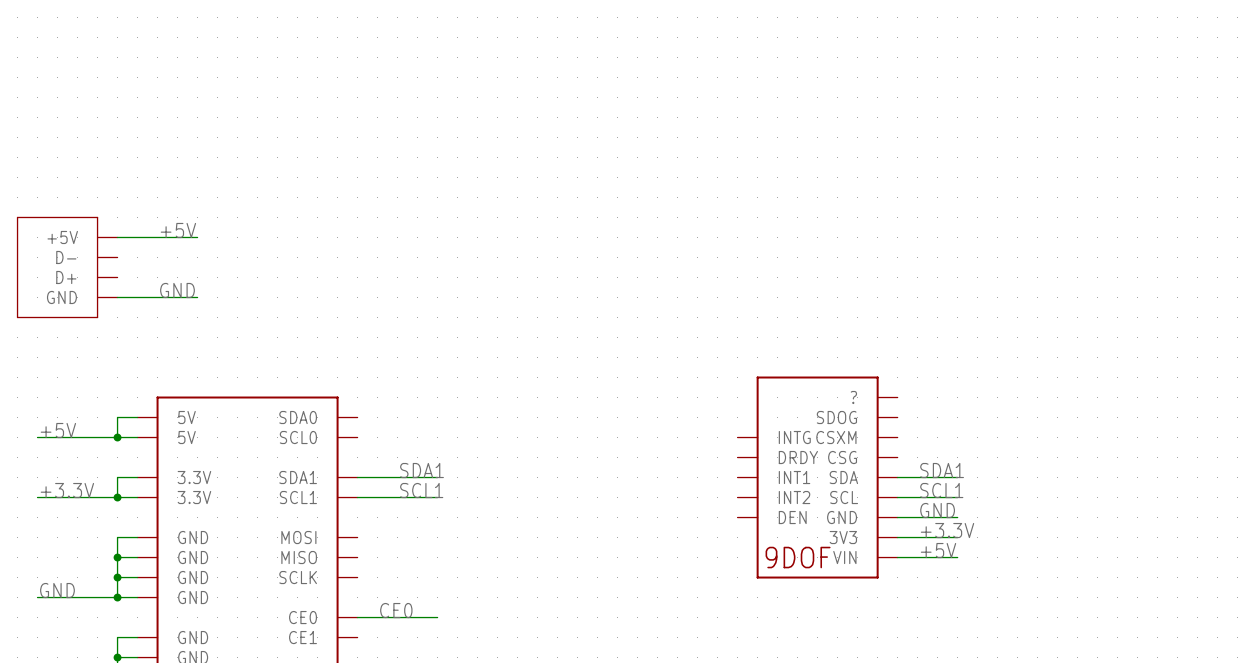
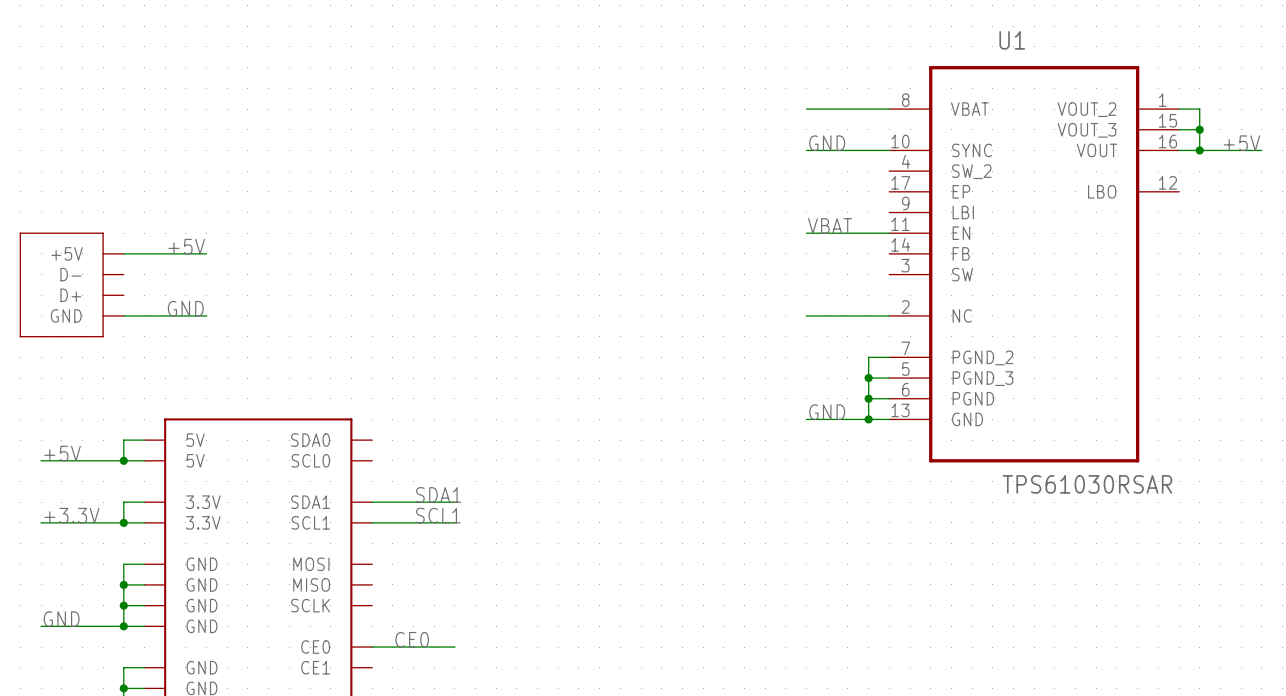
wire: none -> (806, 109) (889, 109)
wire: none -> (1179, 109) (1199, 109) (1199, 150)
wire: none -> (1179, 129) (1199, 129)
junction: none -> (1199, 129)
label: none -> GND (827, 143)
label: none -> +5V (1241, 143)
wire: none -> (806, 150) (889, 150)
wire: none -> (1179, 150) (1261, 150)
junction: none -> (1199, 150)
label: none -> VBAT (829, 225)
wire: none -> (806, 233) (889, 233)
U1: none -> TPS61030RSAR (1034, 264)
wire: none -> (806, 315) (889, 315)
wire: none -> (889, 357) (868, 357) (868, 419)
wire: none -> (868, 378) (889, 378)
junction: none -> (868, 378)
junction: none -> (868, 398)
wire: none -> (806, 419) (889, 419)
junction: none -> (868, 419)
label: SDA1 (942, 470) -> none
part: (817, 477) -> none
wire: (897, 477) (957, 477) -> none
label: SCL1 (941, 490) -> none
wire: (897, 497) (957, 497) -> none
label position: GND (937, 510) -> GND (827, 412)
wire: (897, 517) (957, 517) -> none
label: +3.3V (947, 530) -> none
wire: (897, 537) (957, 537) -> none
label: +5V (938, 550) -> none
wire: (897, 557) (957, 557) -> none

